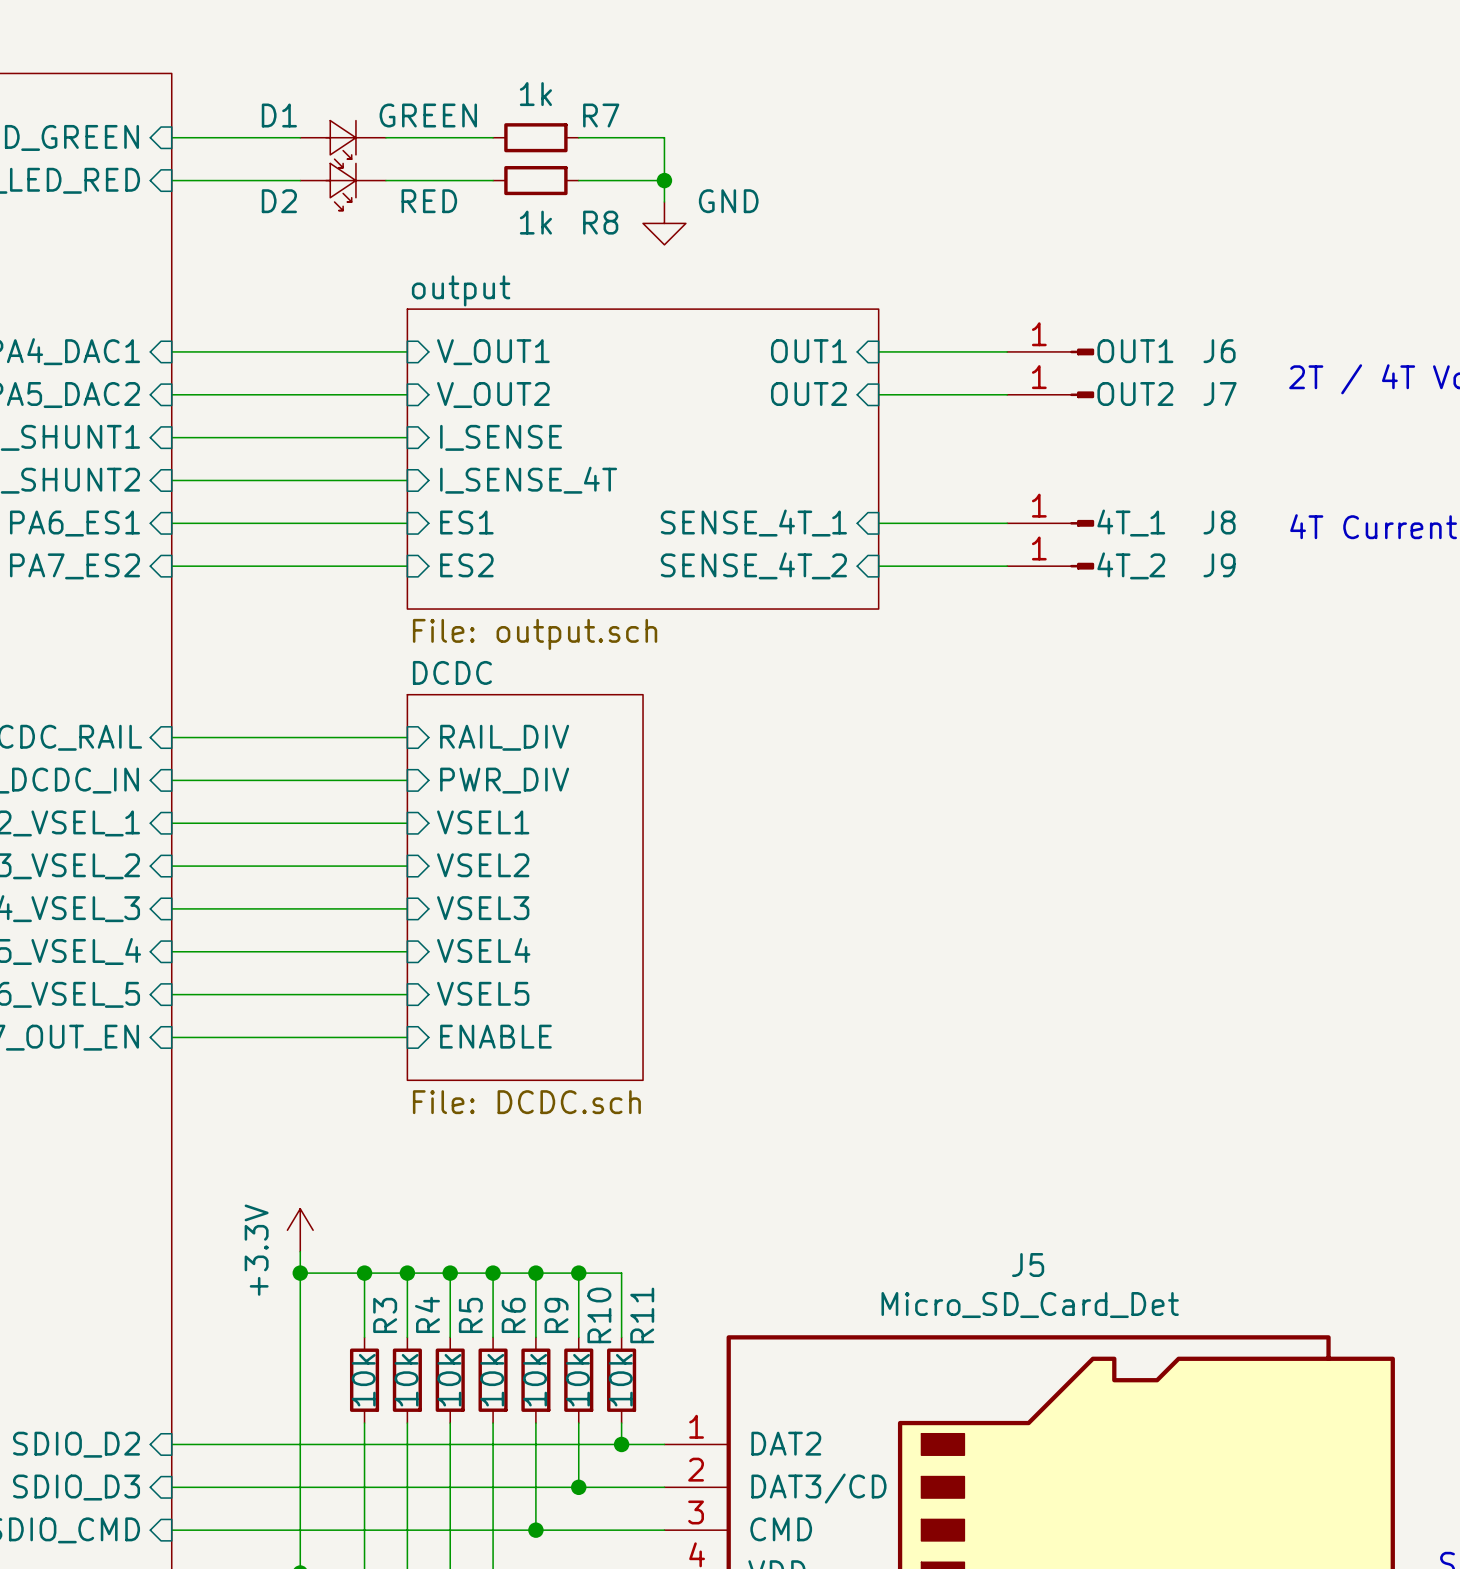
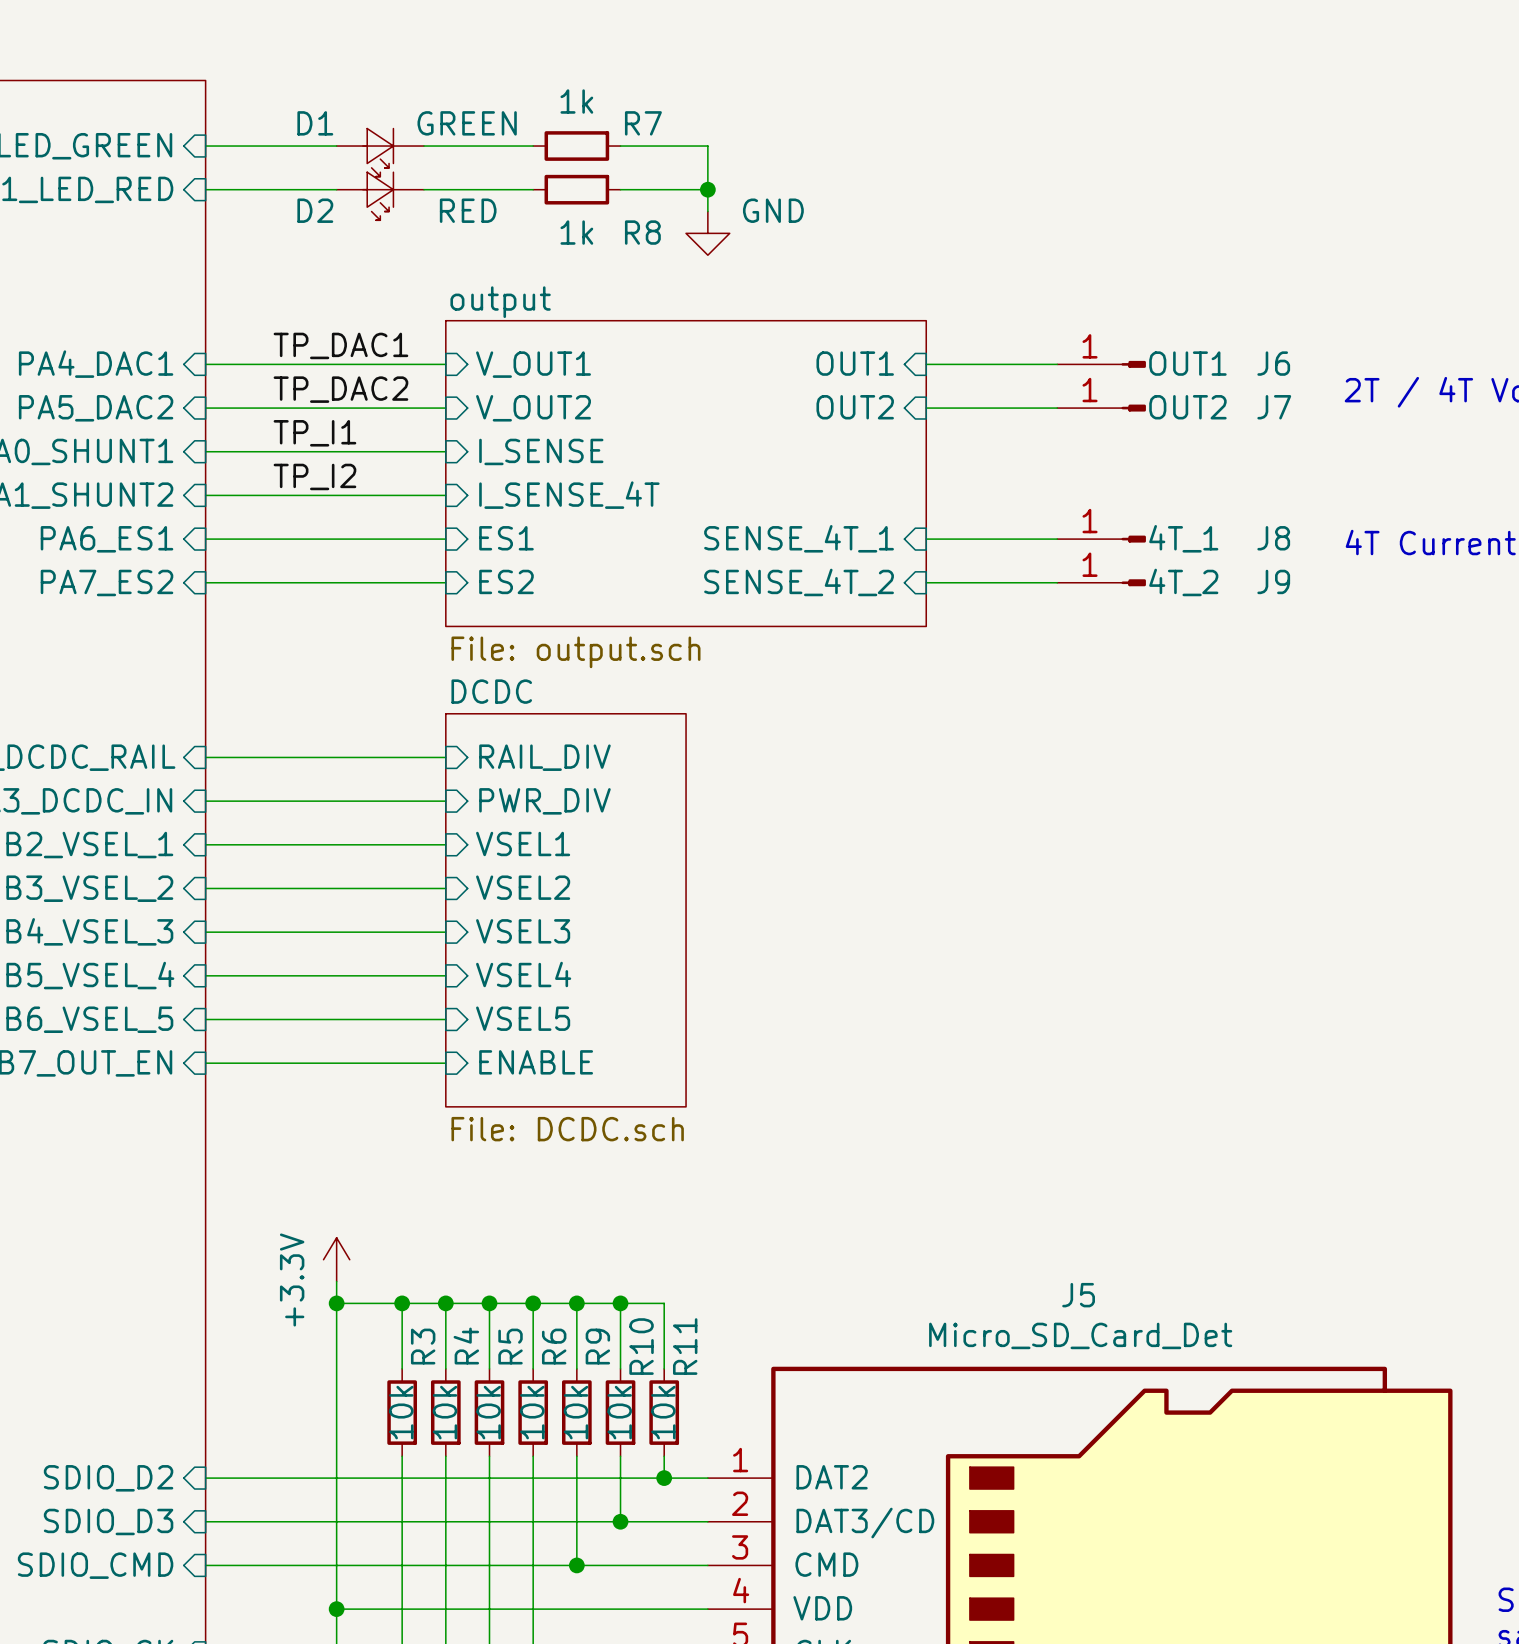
label: none -> TP_DAC1 (340, 345)
label: none -> TP_DAC2 (340, 389)
label: none -> TP_I1 (314, 433)
label: none -> TP_I2 (314, 476)

